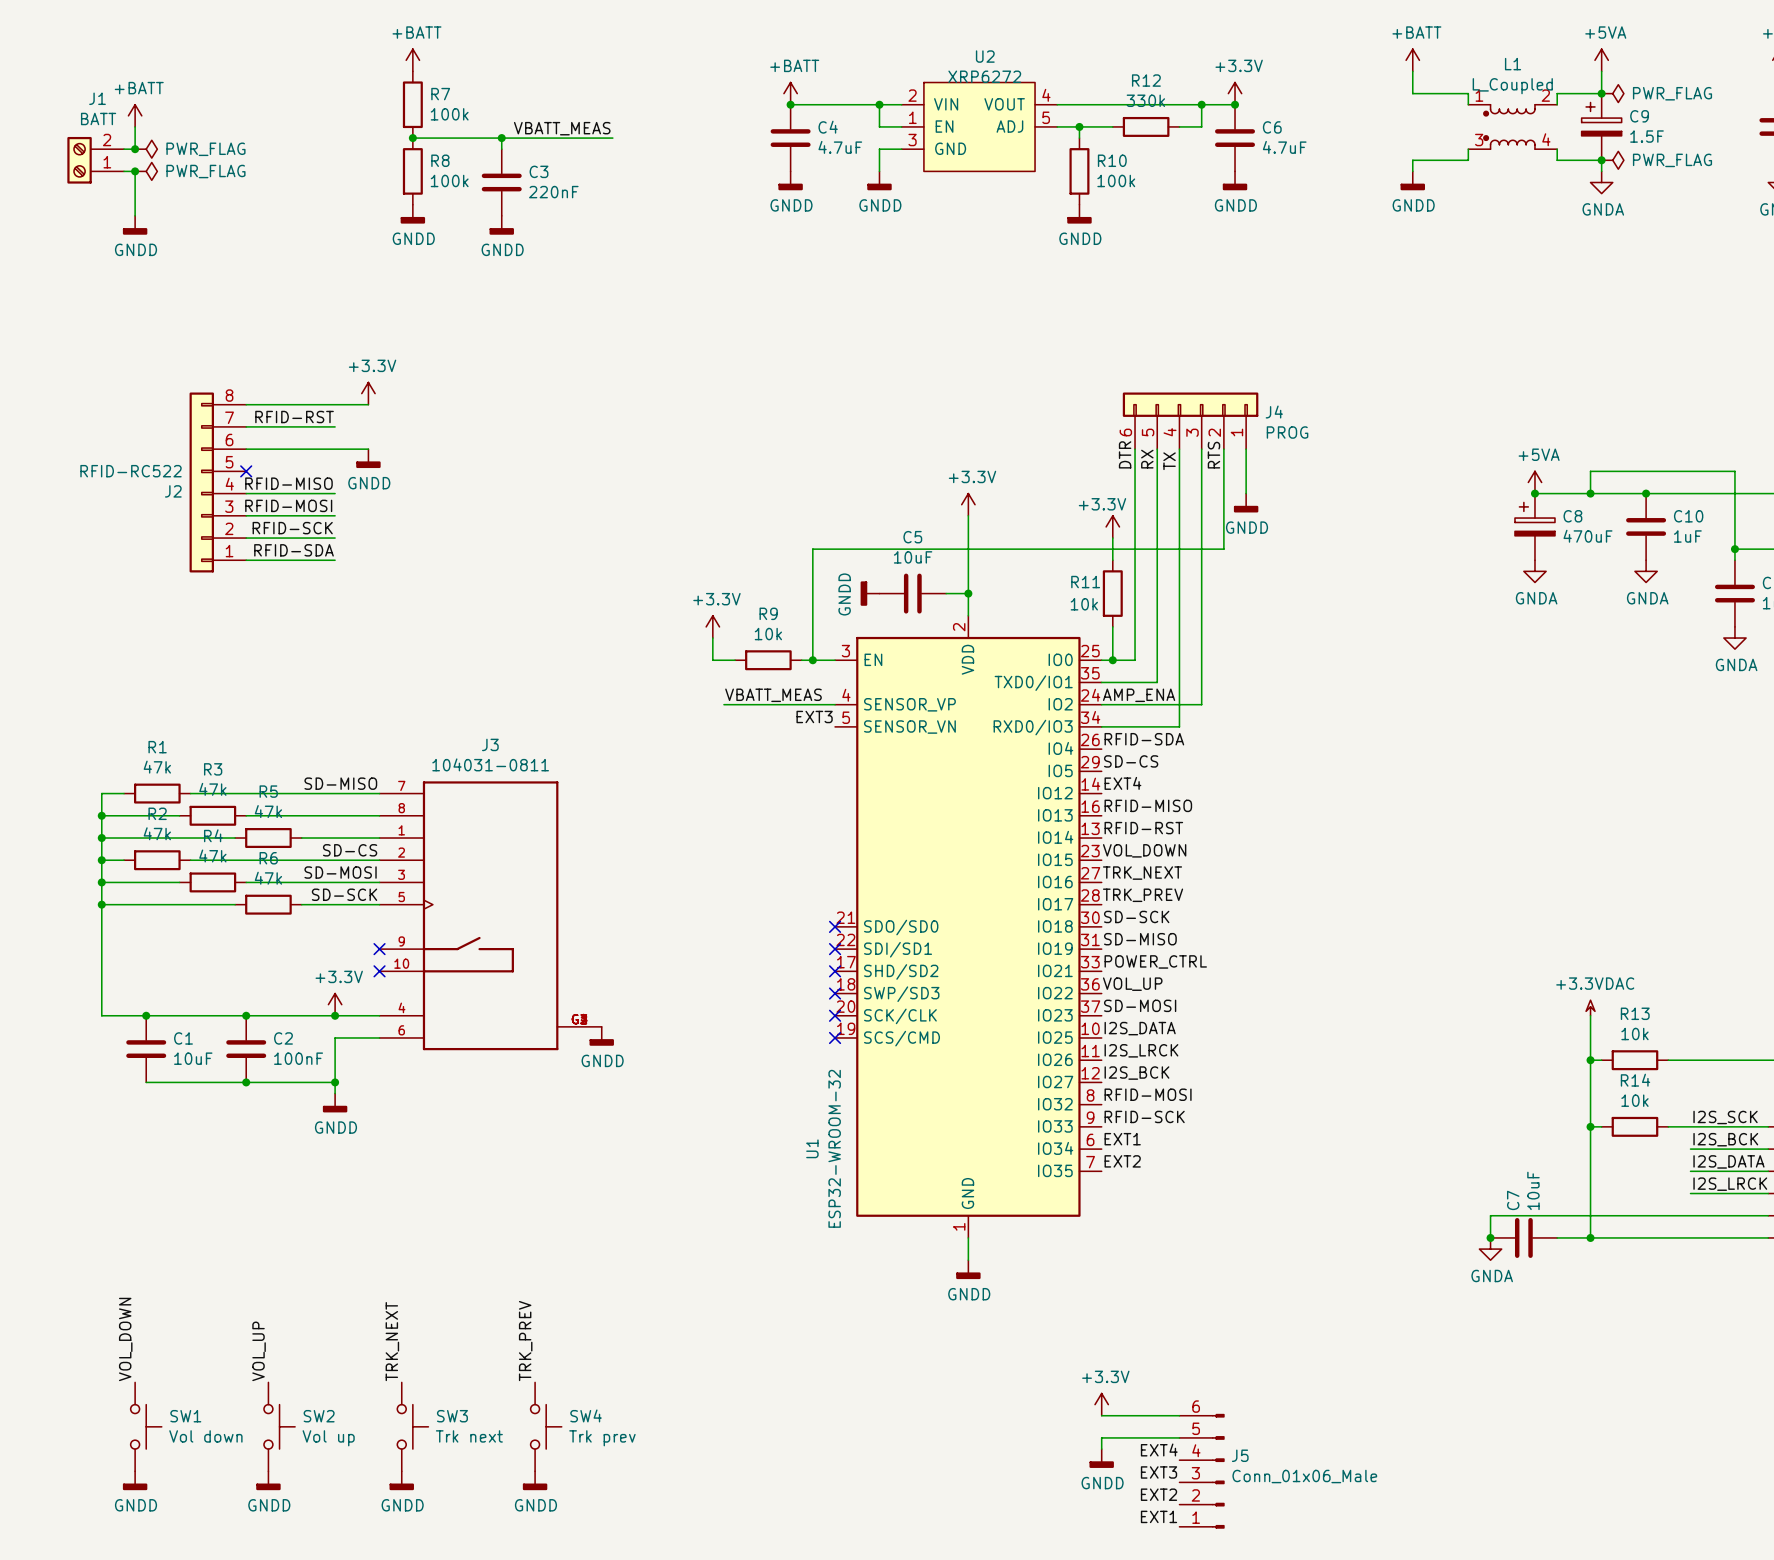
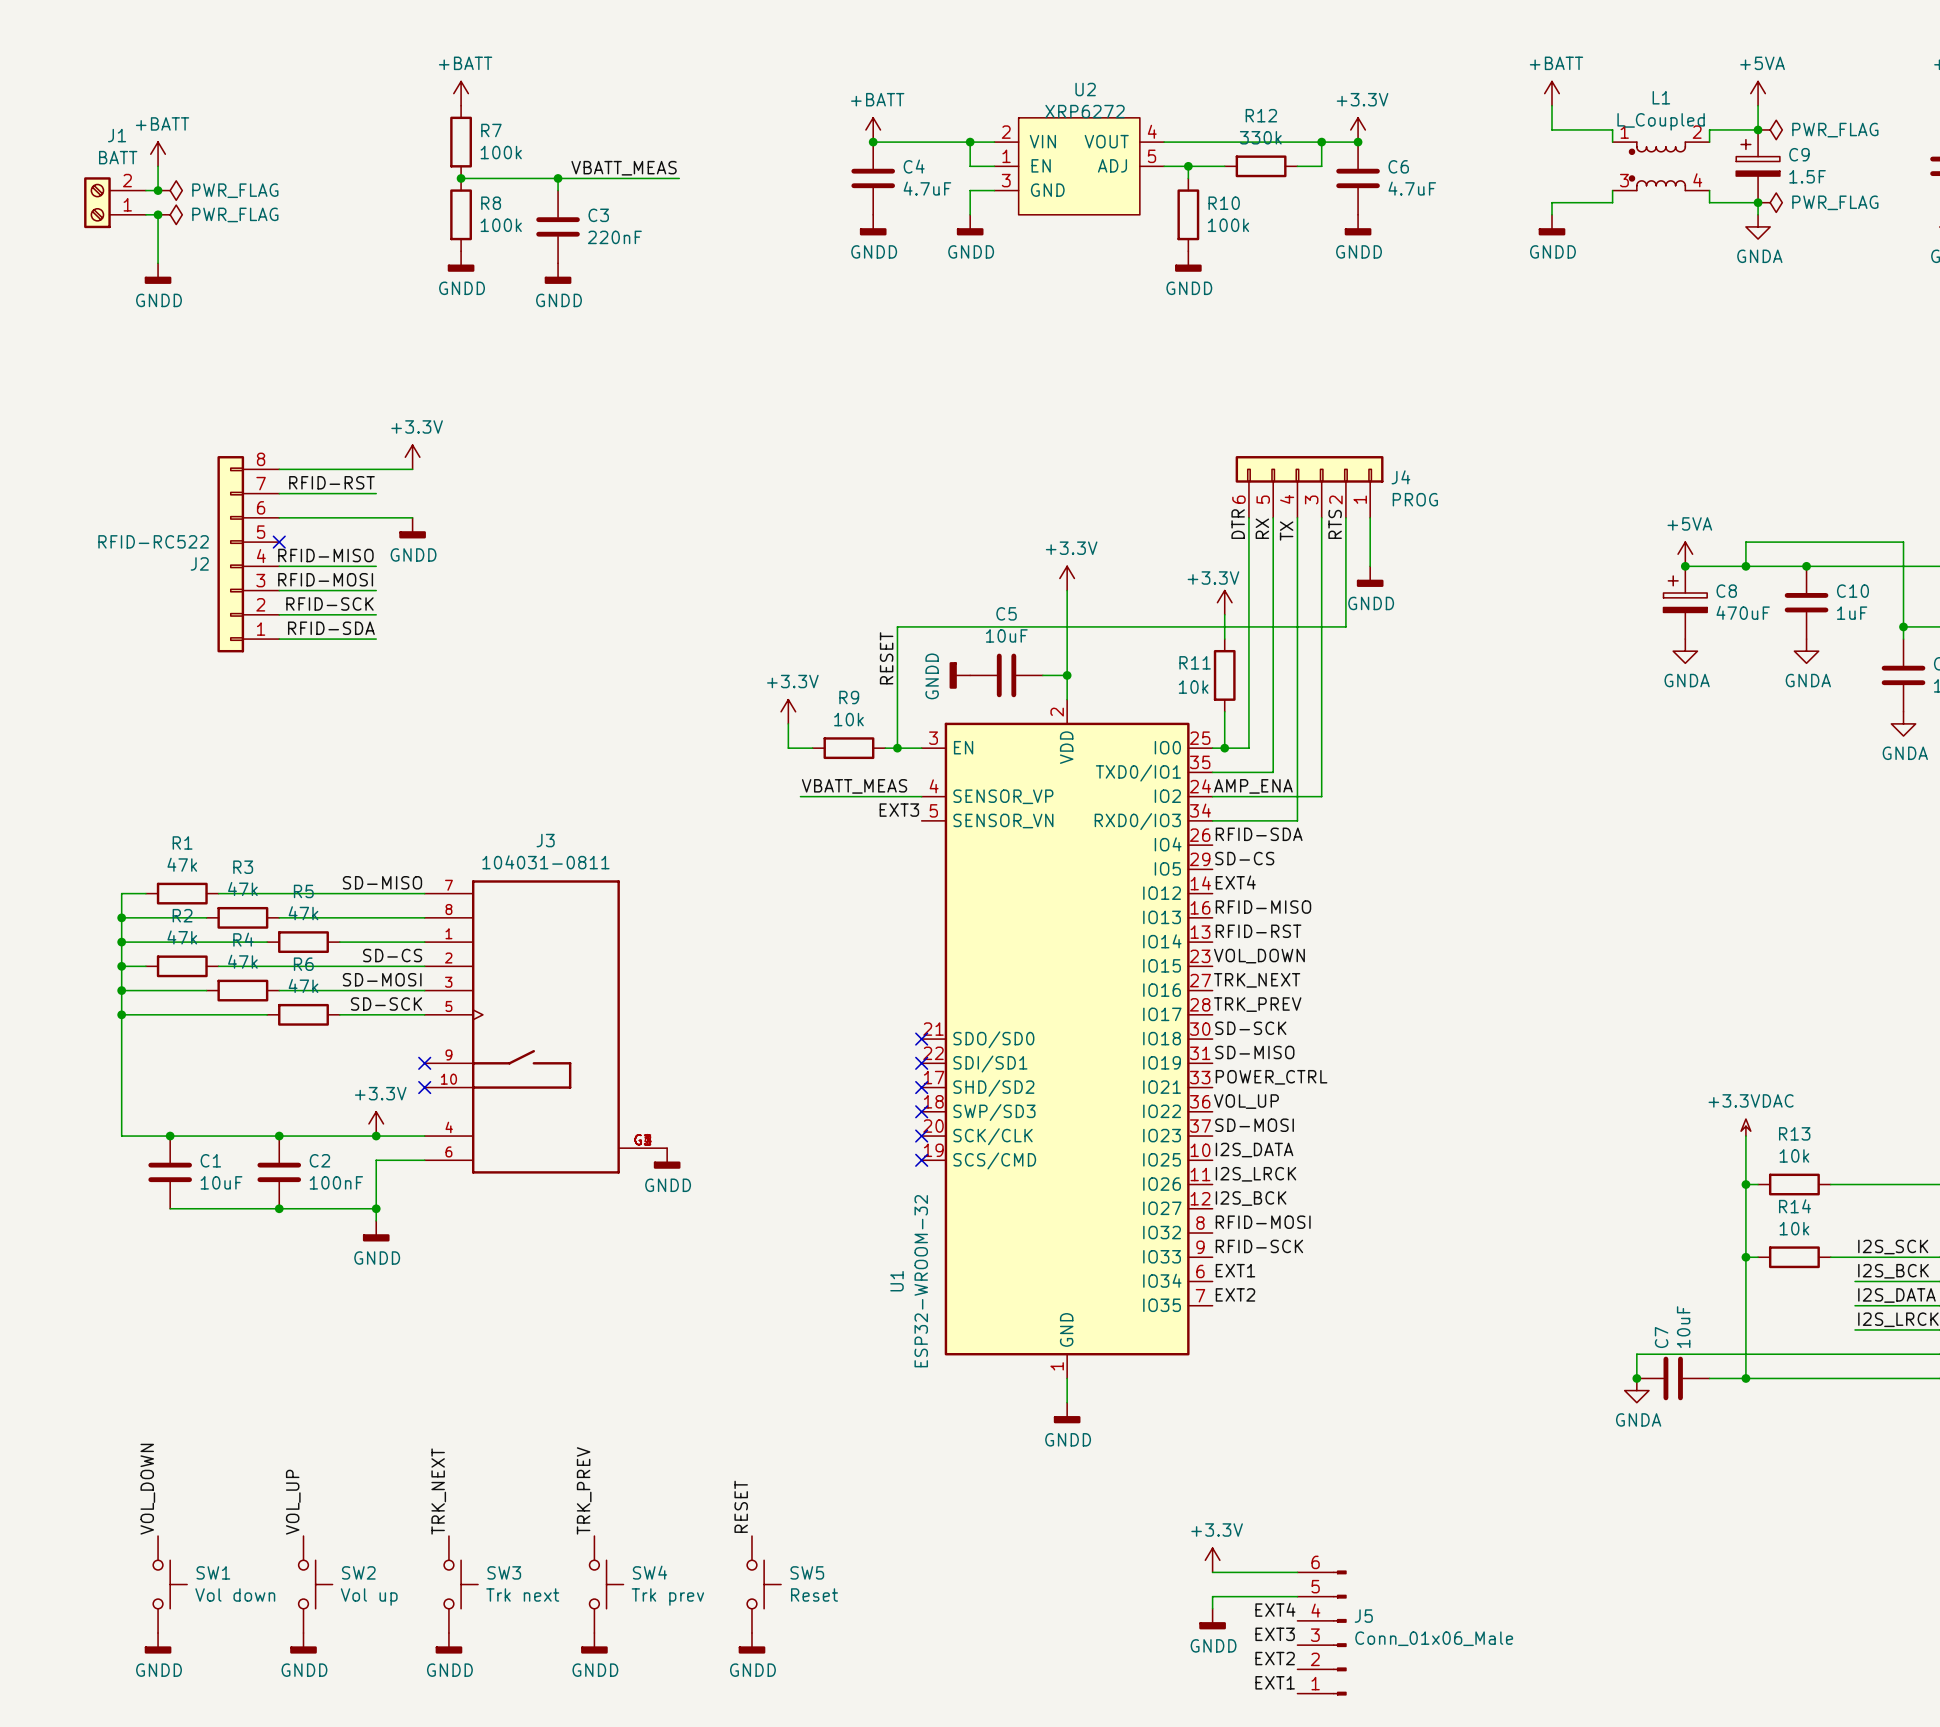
label: none -> RESET (886, 658)
label: none -> RESET (741, 1506)
SW5: none -> Reset (764, 1584)
power symbol: none -> GNDD (751, 1643)

